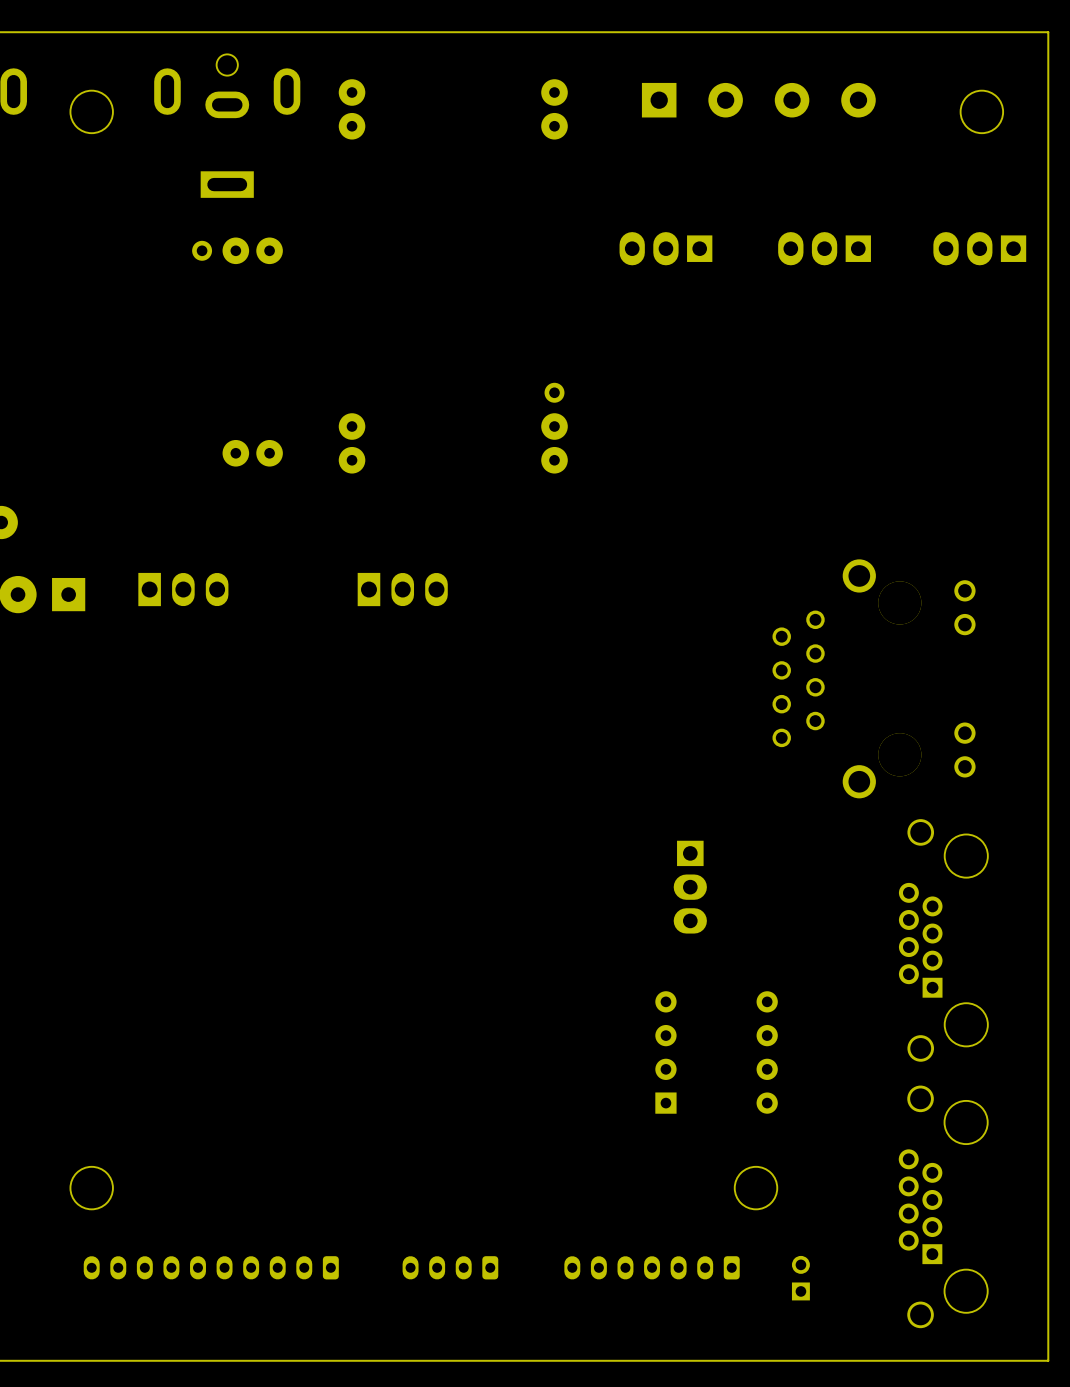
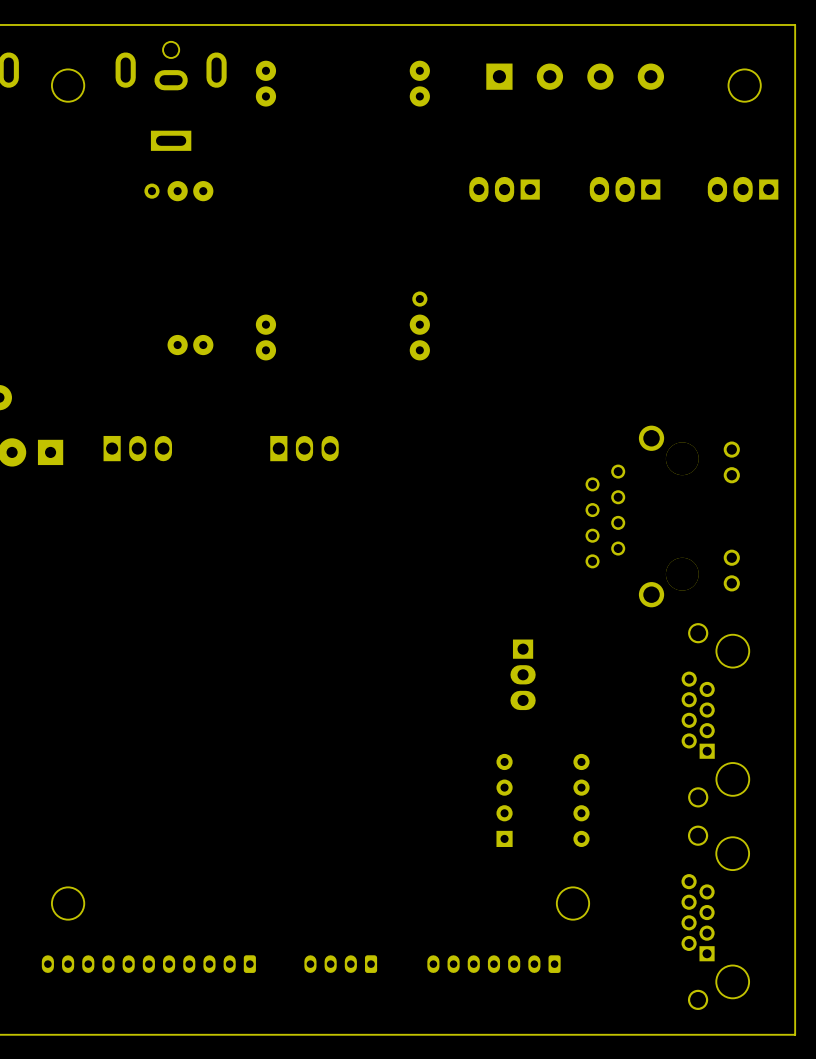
part footprint: [83, 1256, 339, 1280] -> [41, 955, 256, 973]
part: (800, 1278) -> none

